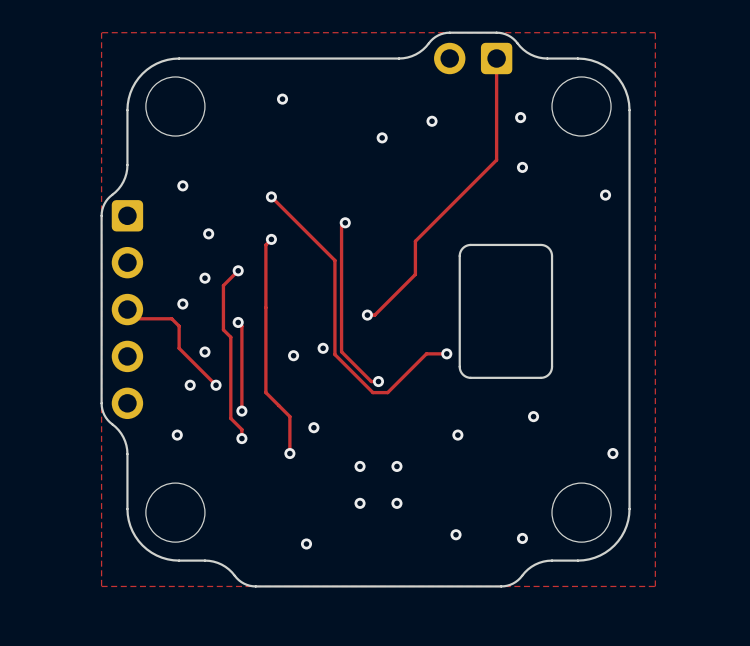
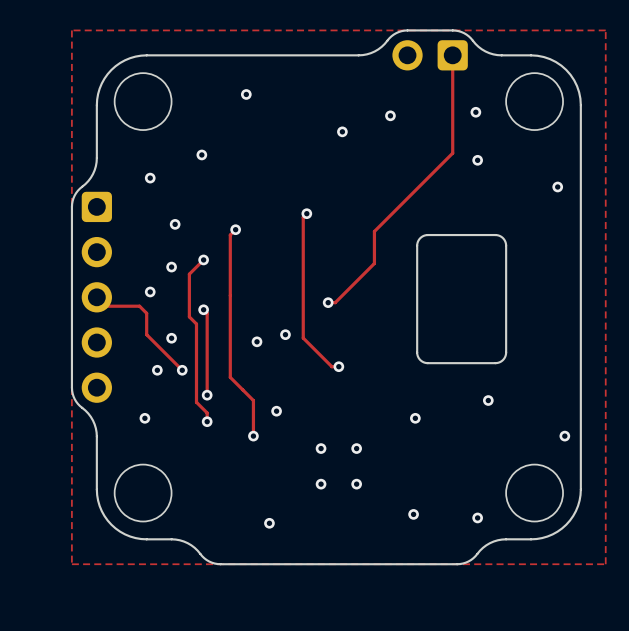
track: (271, 196) (334, 260) (334, 354) (372, 392) (387, 392) (426, 353) (446, 353) -> none
via position: (271, 196) -> (201, 154)
via: (446, 353) -> none

